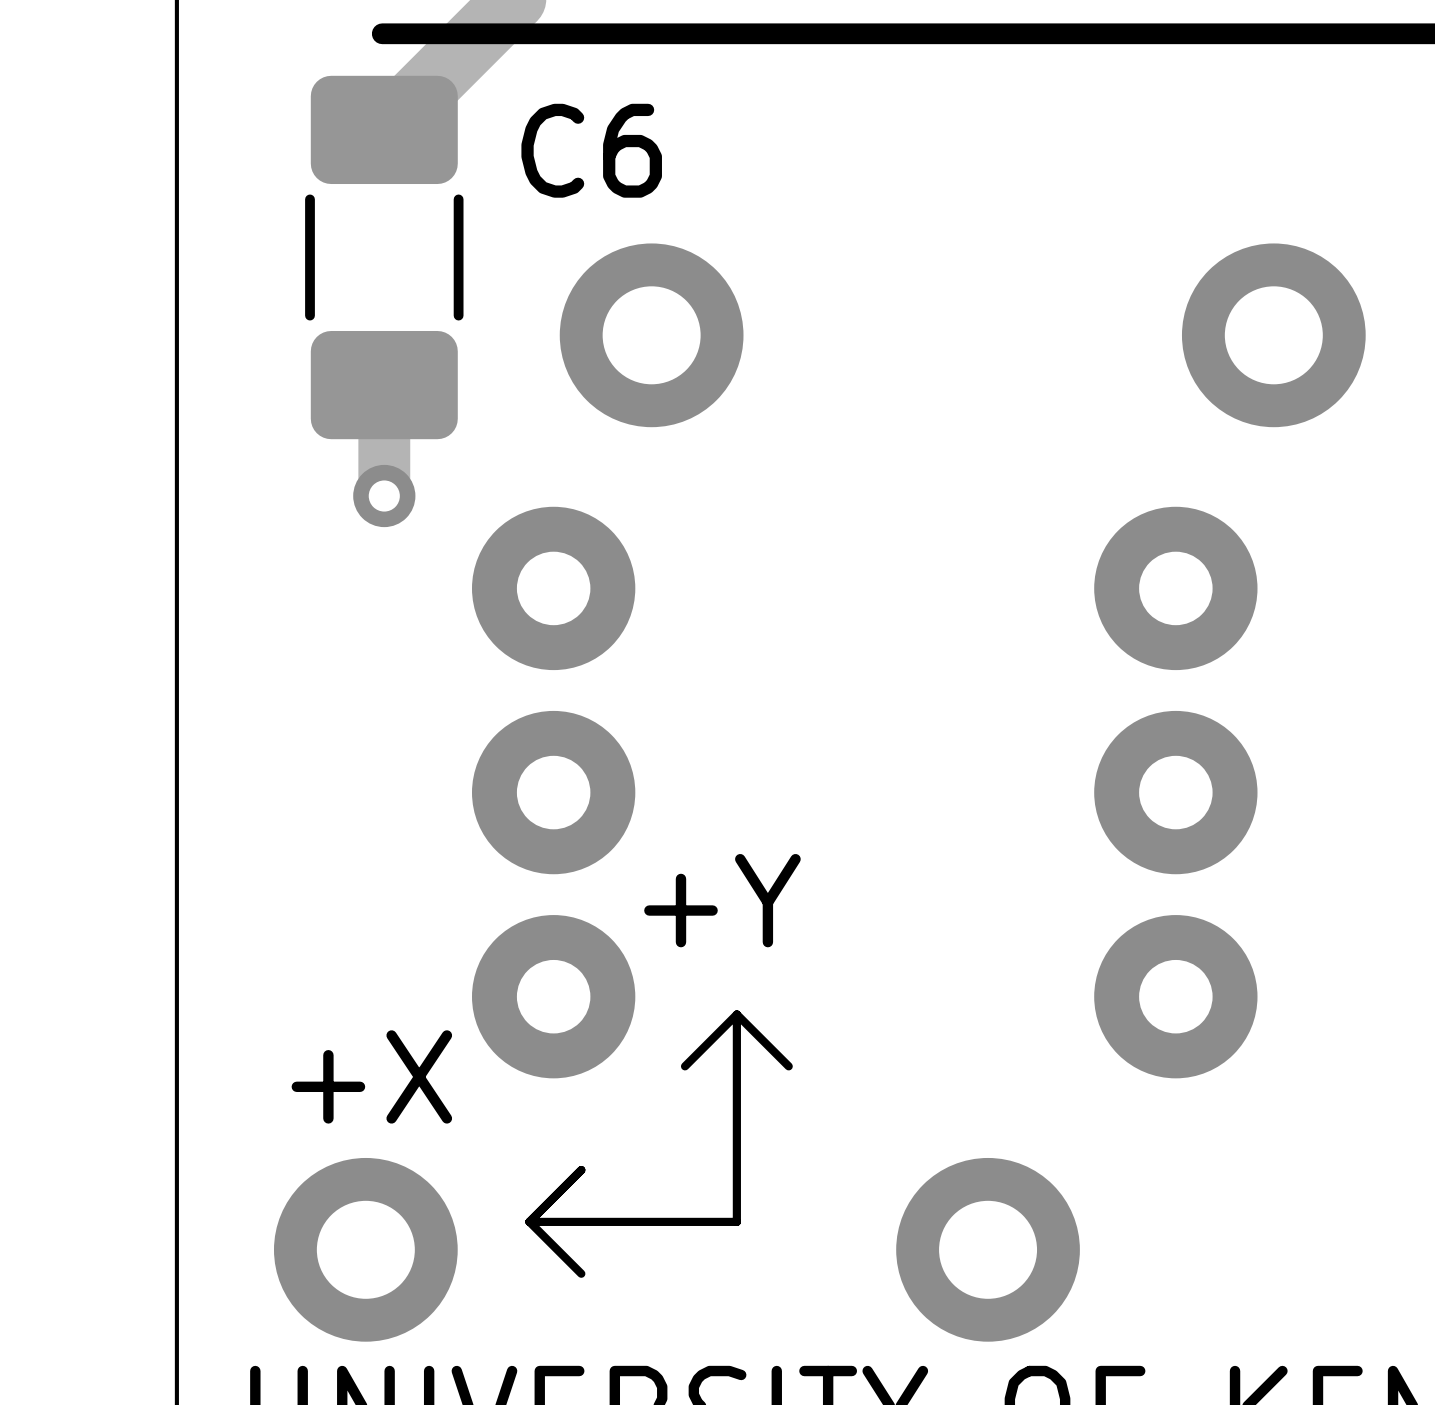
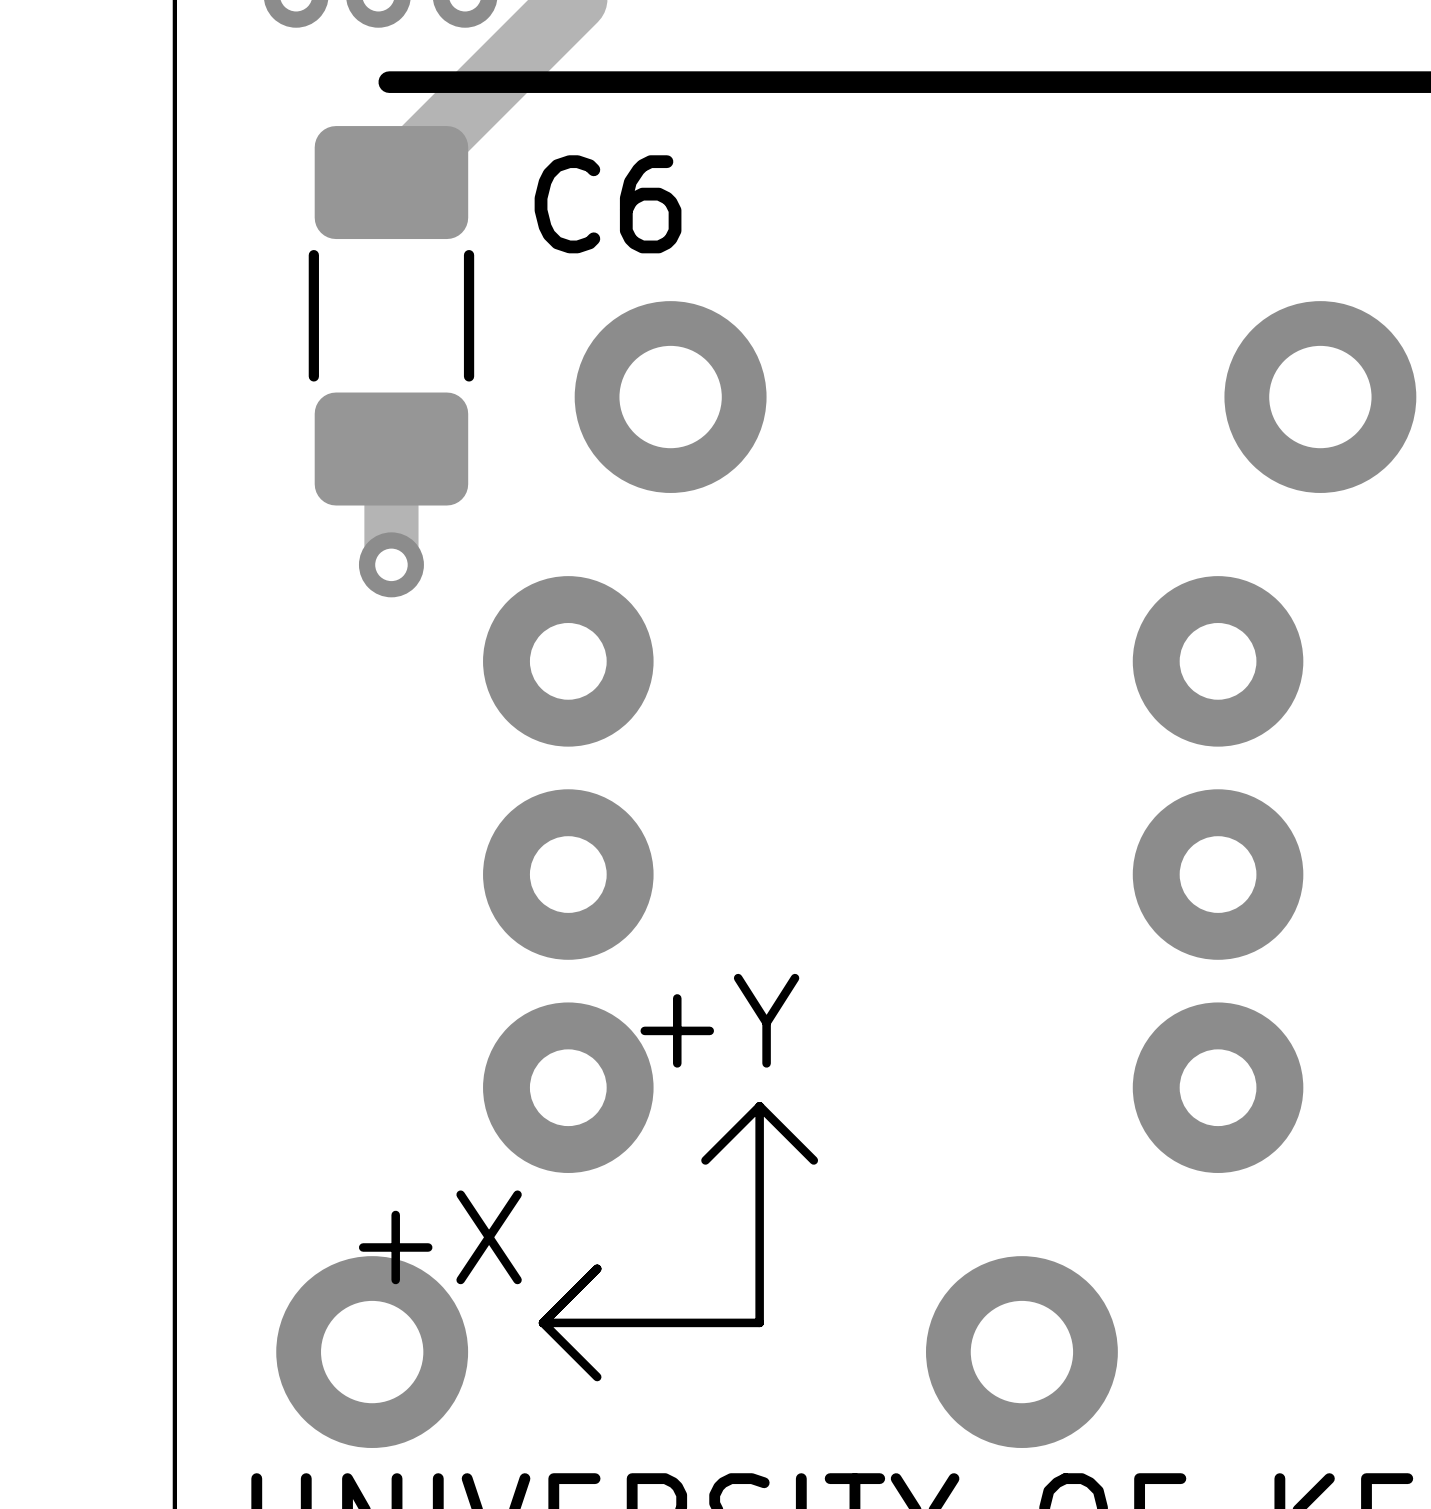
text position: +Y (722, 900) -> +Y (719, 1020)
text position: +X (371, 1076) -> +X (440, 1237)

